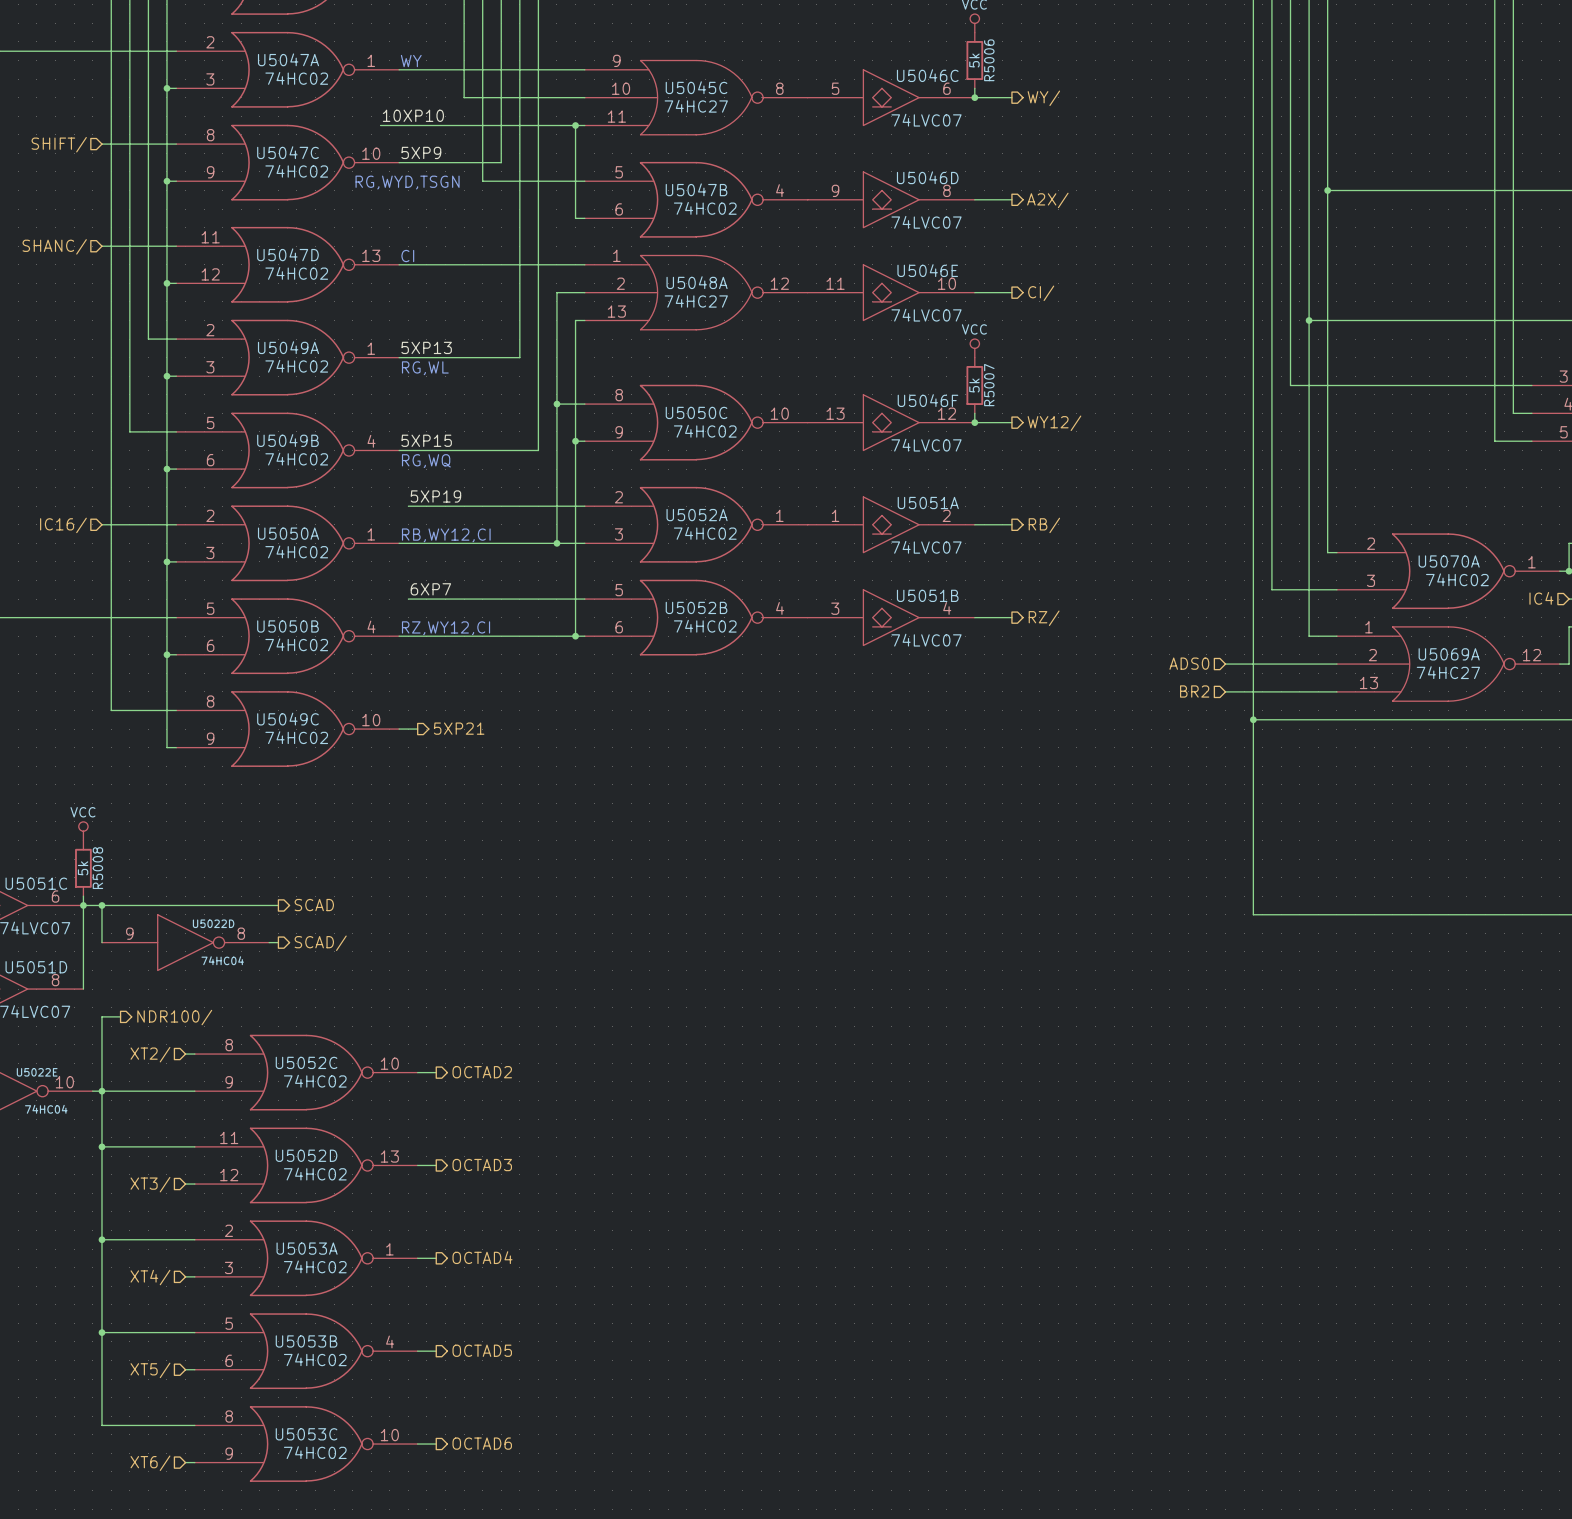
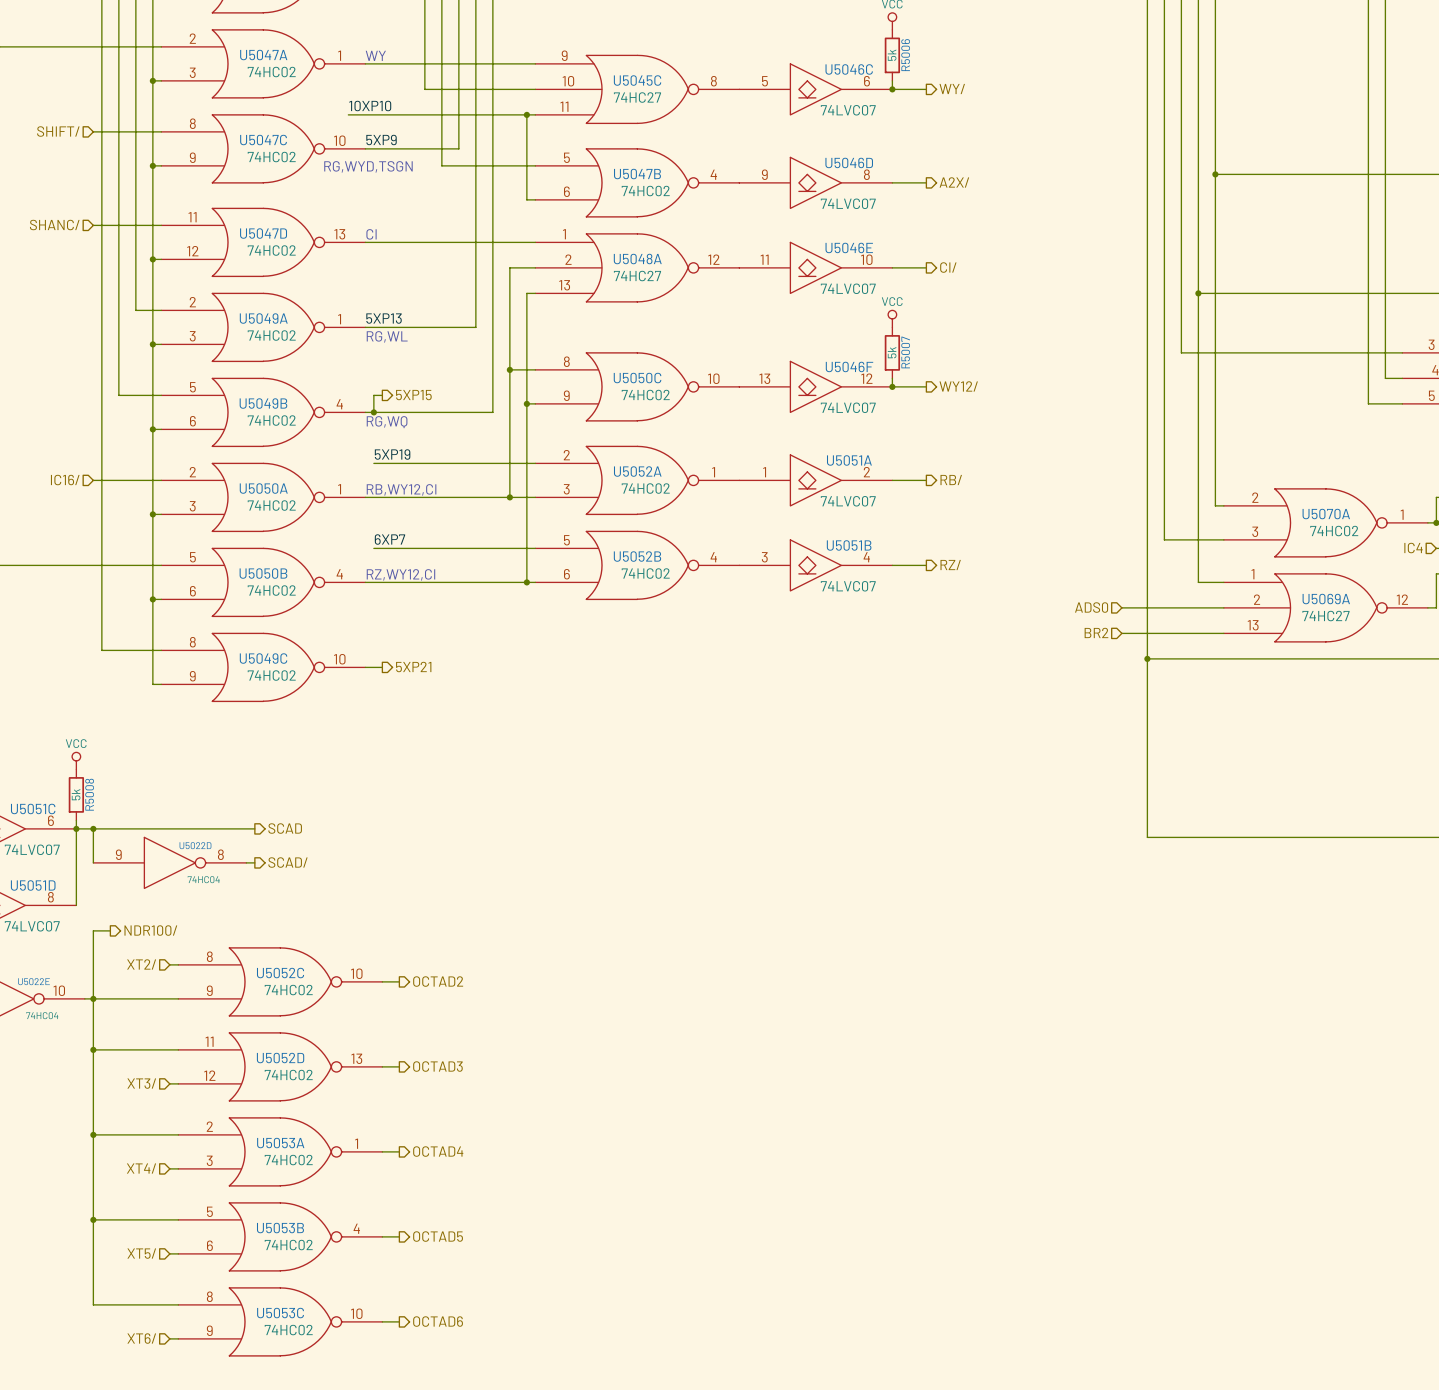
wire: none -> (382, 395) (373, 395) (373, 412)
hierarchical label: none -> 5XP15 (413, 395)
label: 5XP15 (426, 440) -> none
junction: none -> (373, 412)

